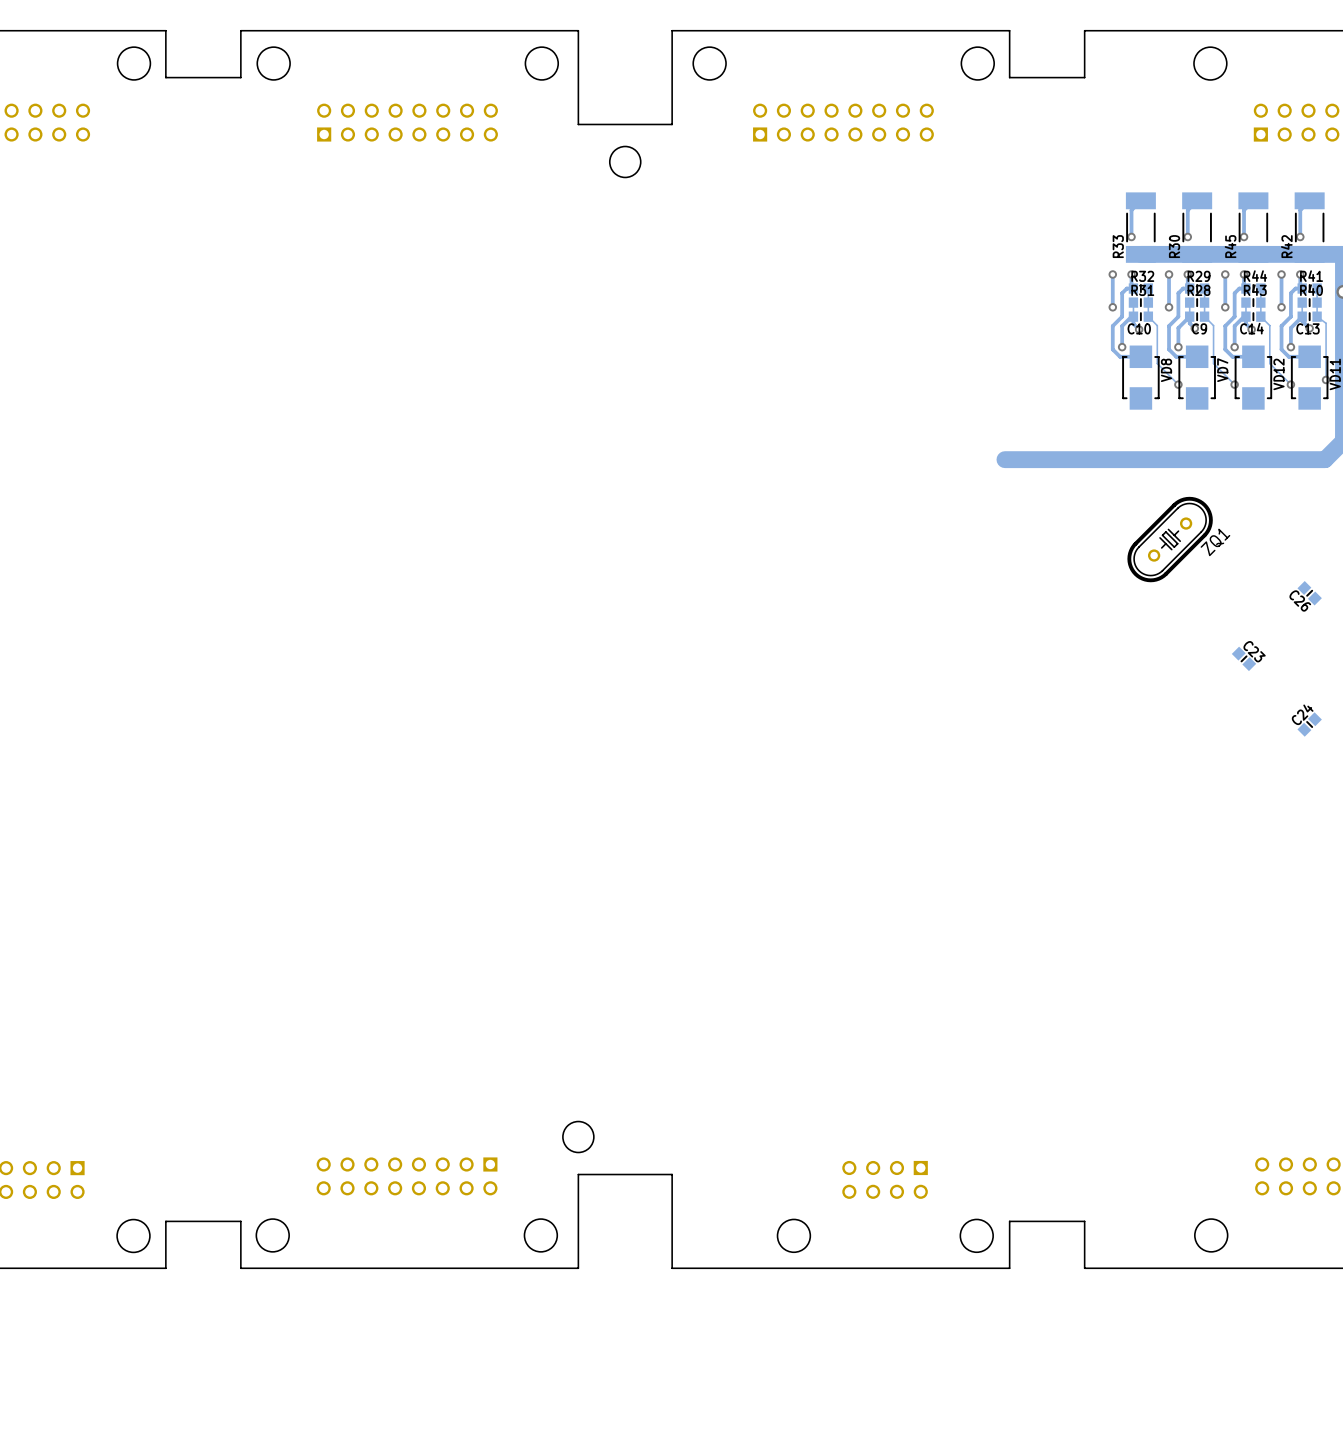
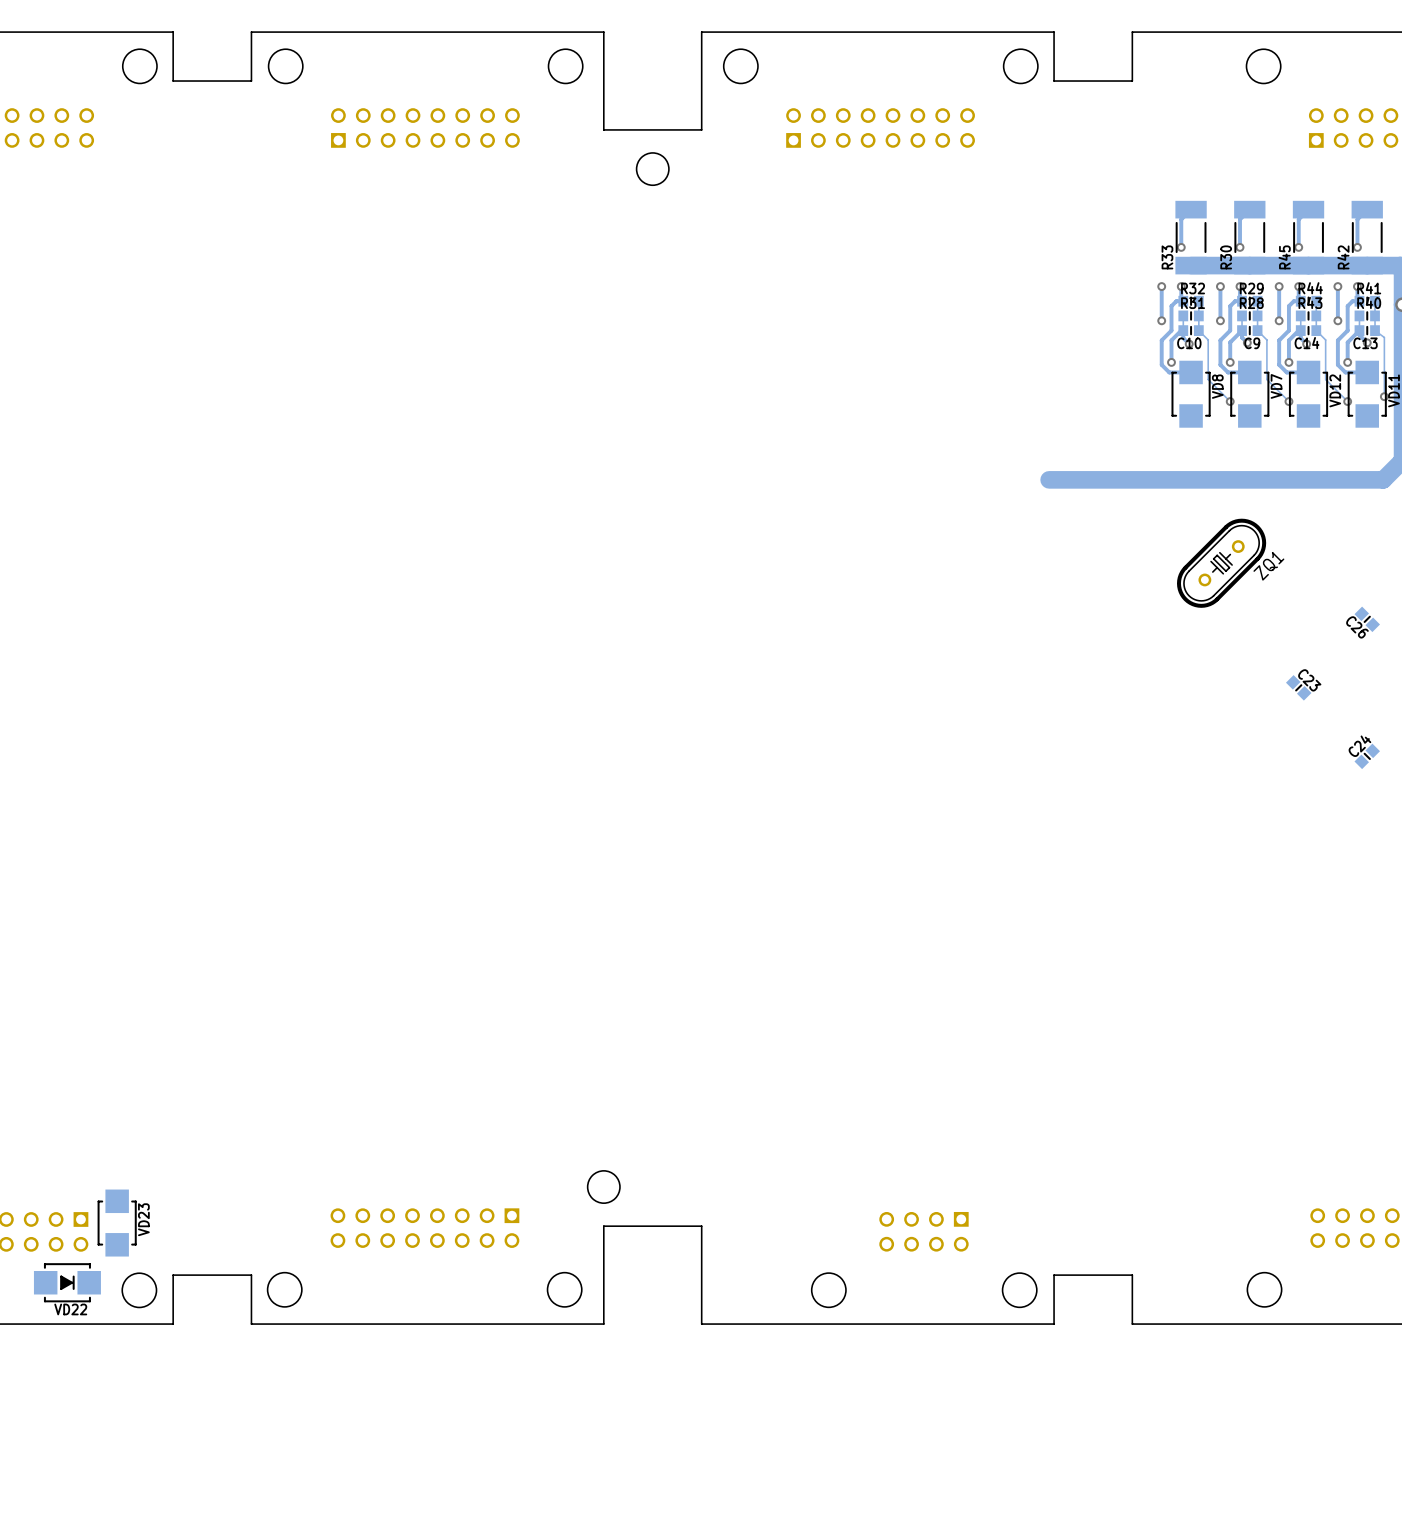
VD23: none -> (117, 1223)
VD22: none -> (67, 1282)

